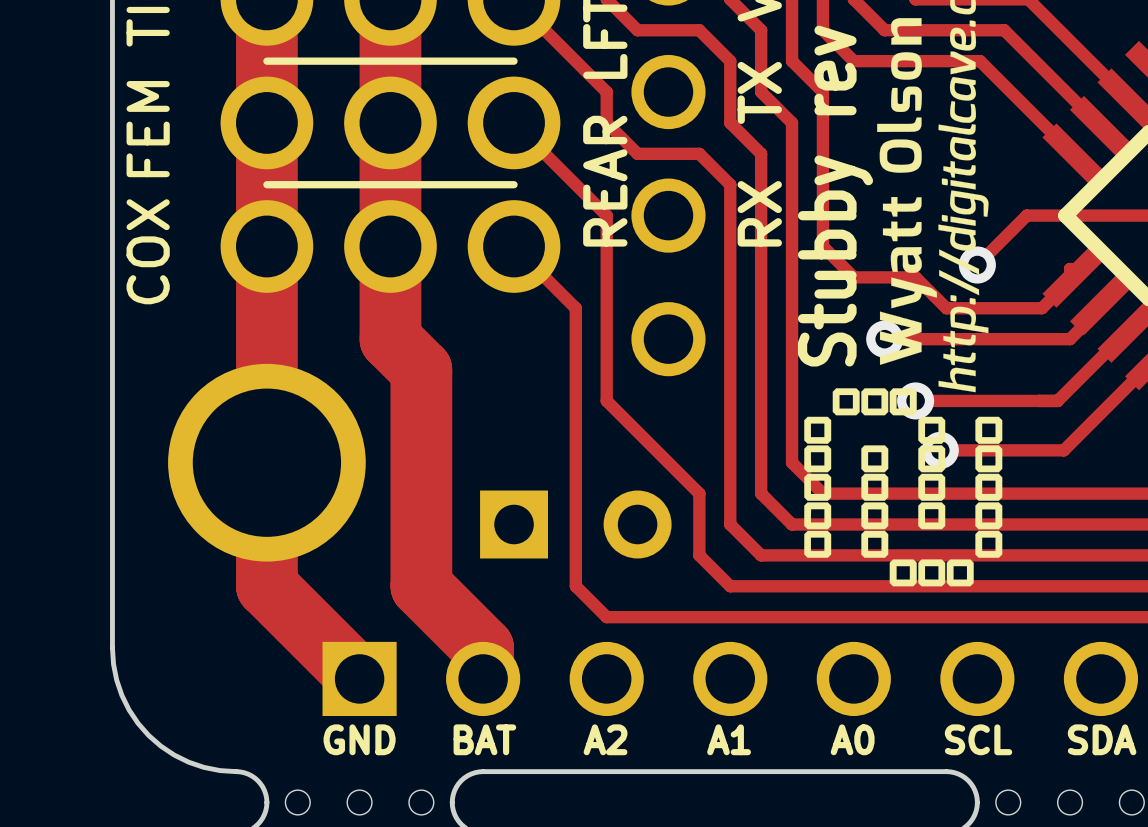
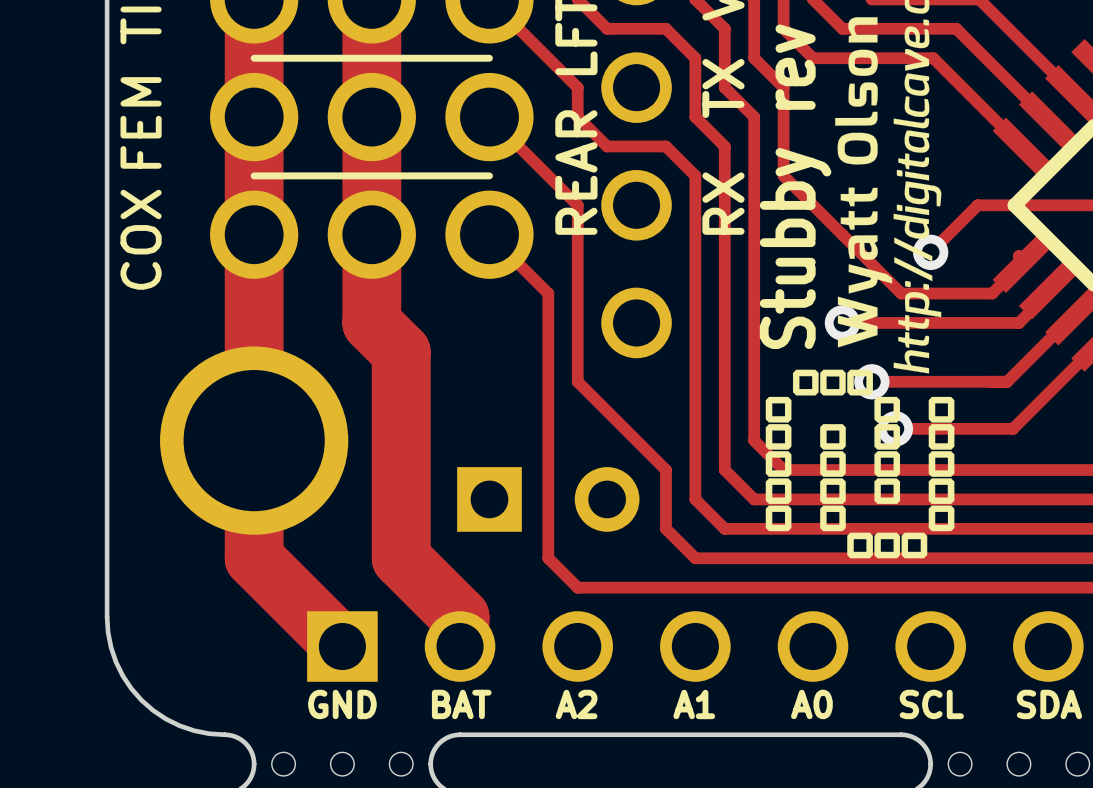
track: (822, 184) (822, 246) (853, 277) (915, 277) -> (783, 175) (871, 264)

